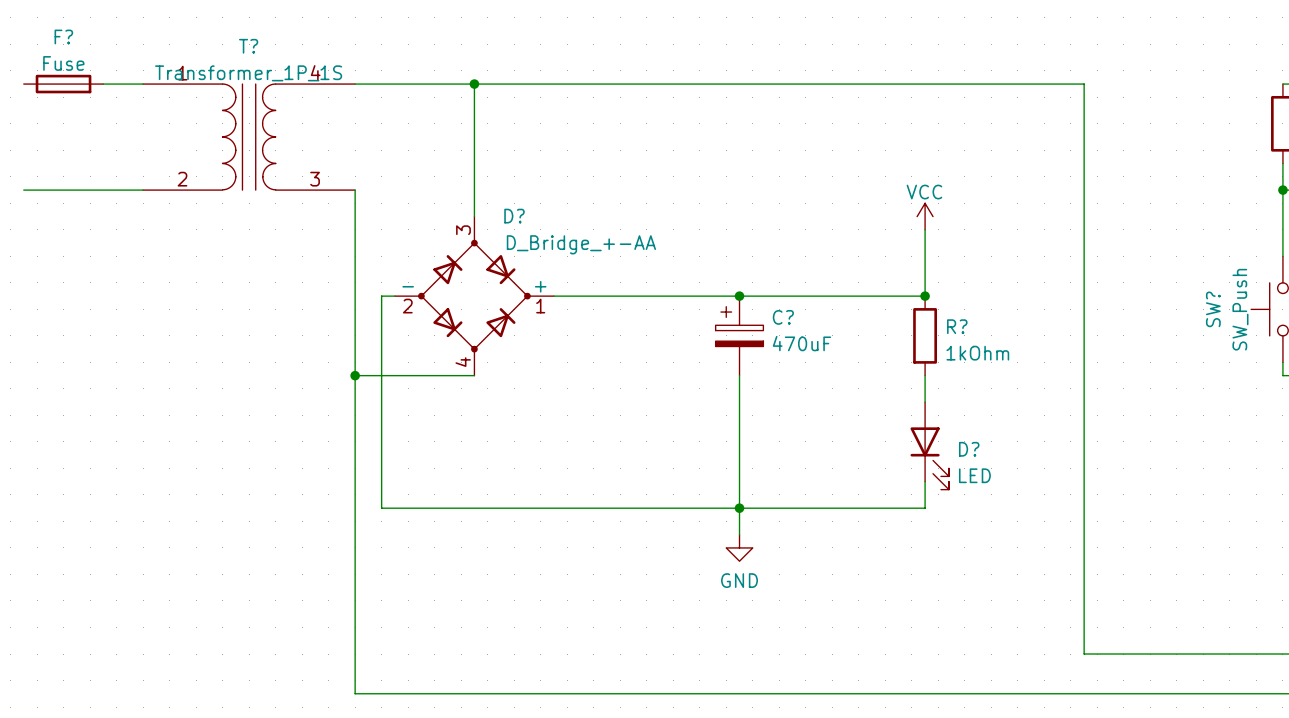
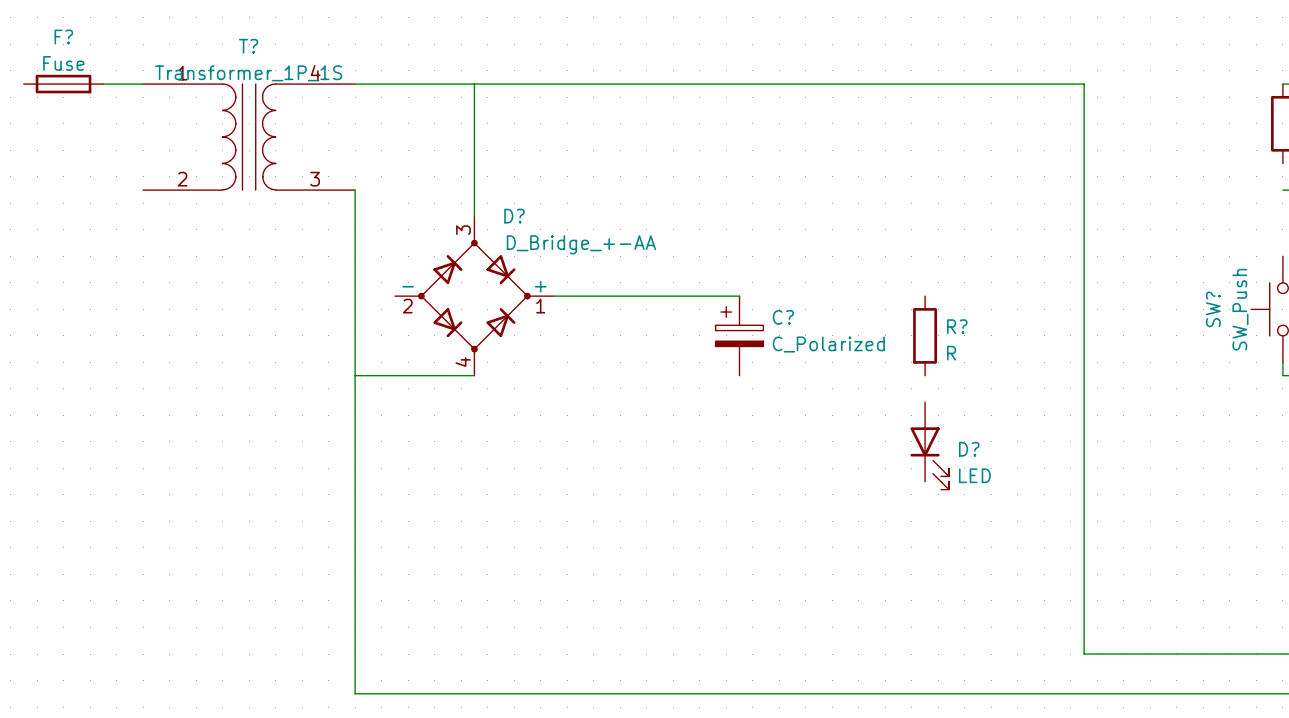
junction: (474, 84) -> none
wire: (1282, 163) (1282, 256) -> none
wire: (23, 190) (143, 190) -> none
junction: (1282, 190) -> none
power symbol: VCC (925, 216) -> none
wire: (925, 229) (925, 296) (739, 296) -> none
wire: (394, 296) (381, 296) (381, 508) (925, 508) (925, 481) -> none
junction: (739, 296) -> none
junction: (925, 296) -> none
C? value: 470uF (801, 343) -> C_Polarized (828, 344)
R? value: 1kOhm (977, 353) -> R (951, 353)
junction: (355, 375) -> none
wire: (739, 375) (739, 534) -> none
wire: (925, 375) (925, 402) -> none
junction: (739, 508) -> none
power symbol: GND (739, 547) -> none

